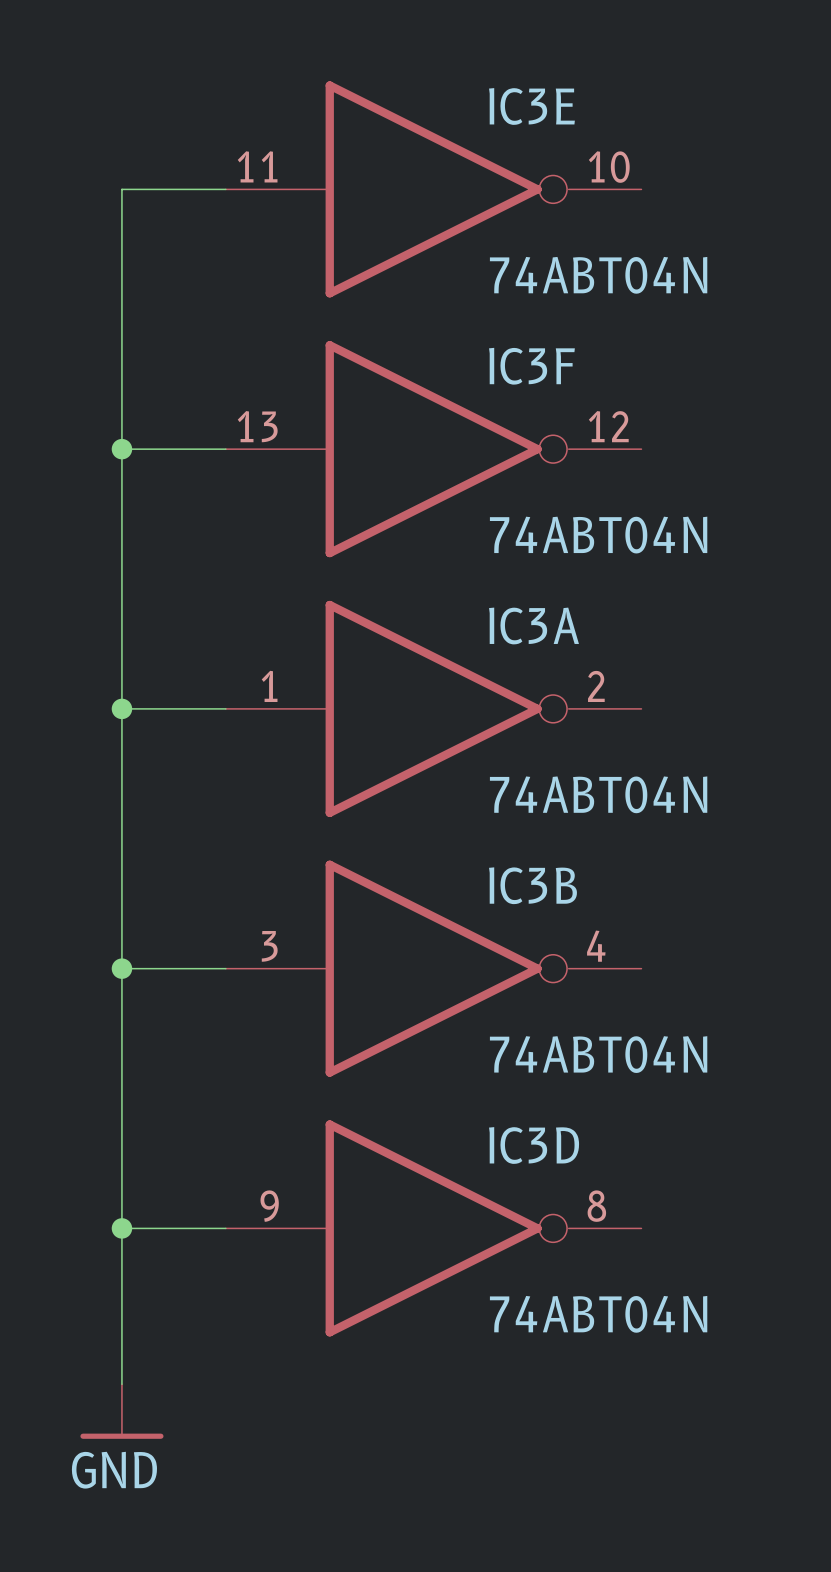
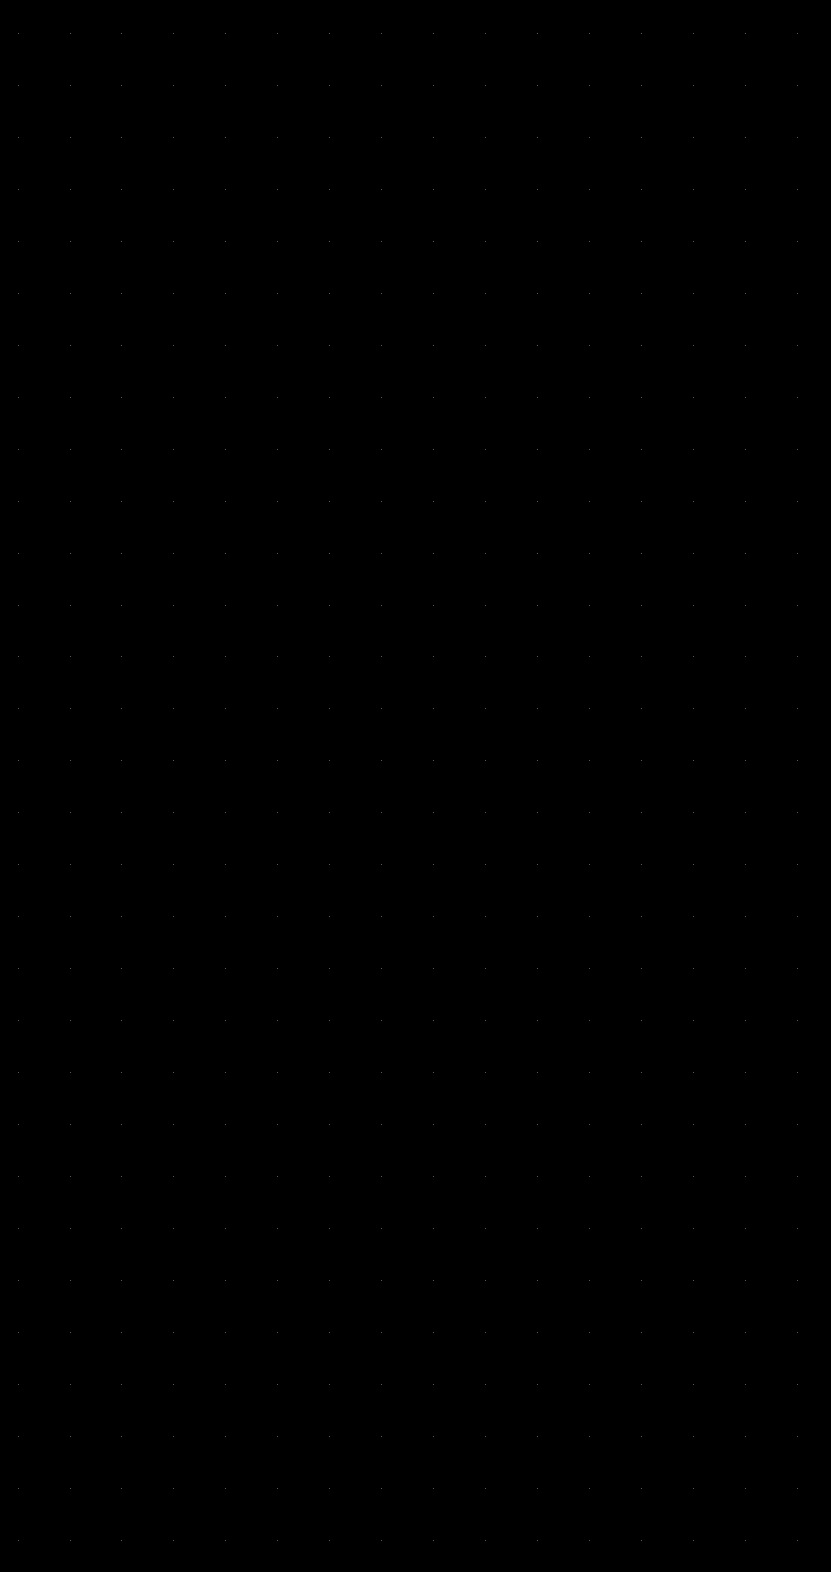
wire: (225, 189) (121, 189) (121, 1384) -> none
IC3E: 74ABT04N (433, 189) -> none
wire: (121, 449) (225, 449) -> none
junction: (121, 449) -> none
IC3F: 74ABT04N (433, 449) -> none
wire: (121, 708) (225, 708) -> none
junction: (121, 708) -> none
IC3A: 74ABT04N (433, 708) -> none
wire: (121, 968) (225, 968) -> none
junction: (121, 968) -> none
IC3B: 74ABT04N (433, 968) -> none
wire: (121, 1228) (225, 1228) -> none
junction: (121, 1228) -> none
IC3D: 74ABT04N (433, 1228) -> none
power symbol: GND (121, 1411) -> none

